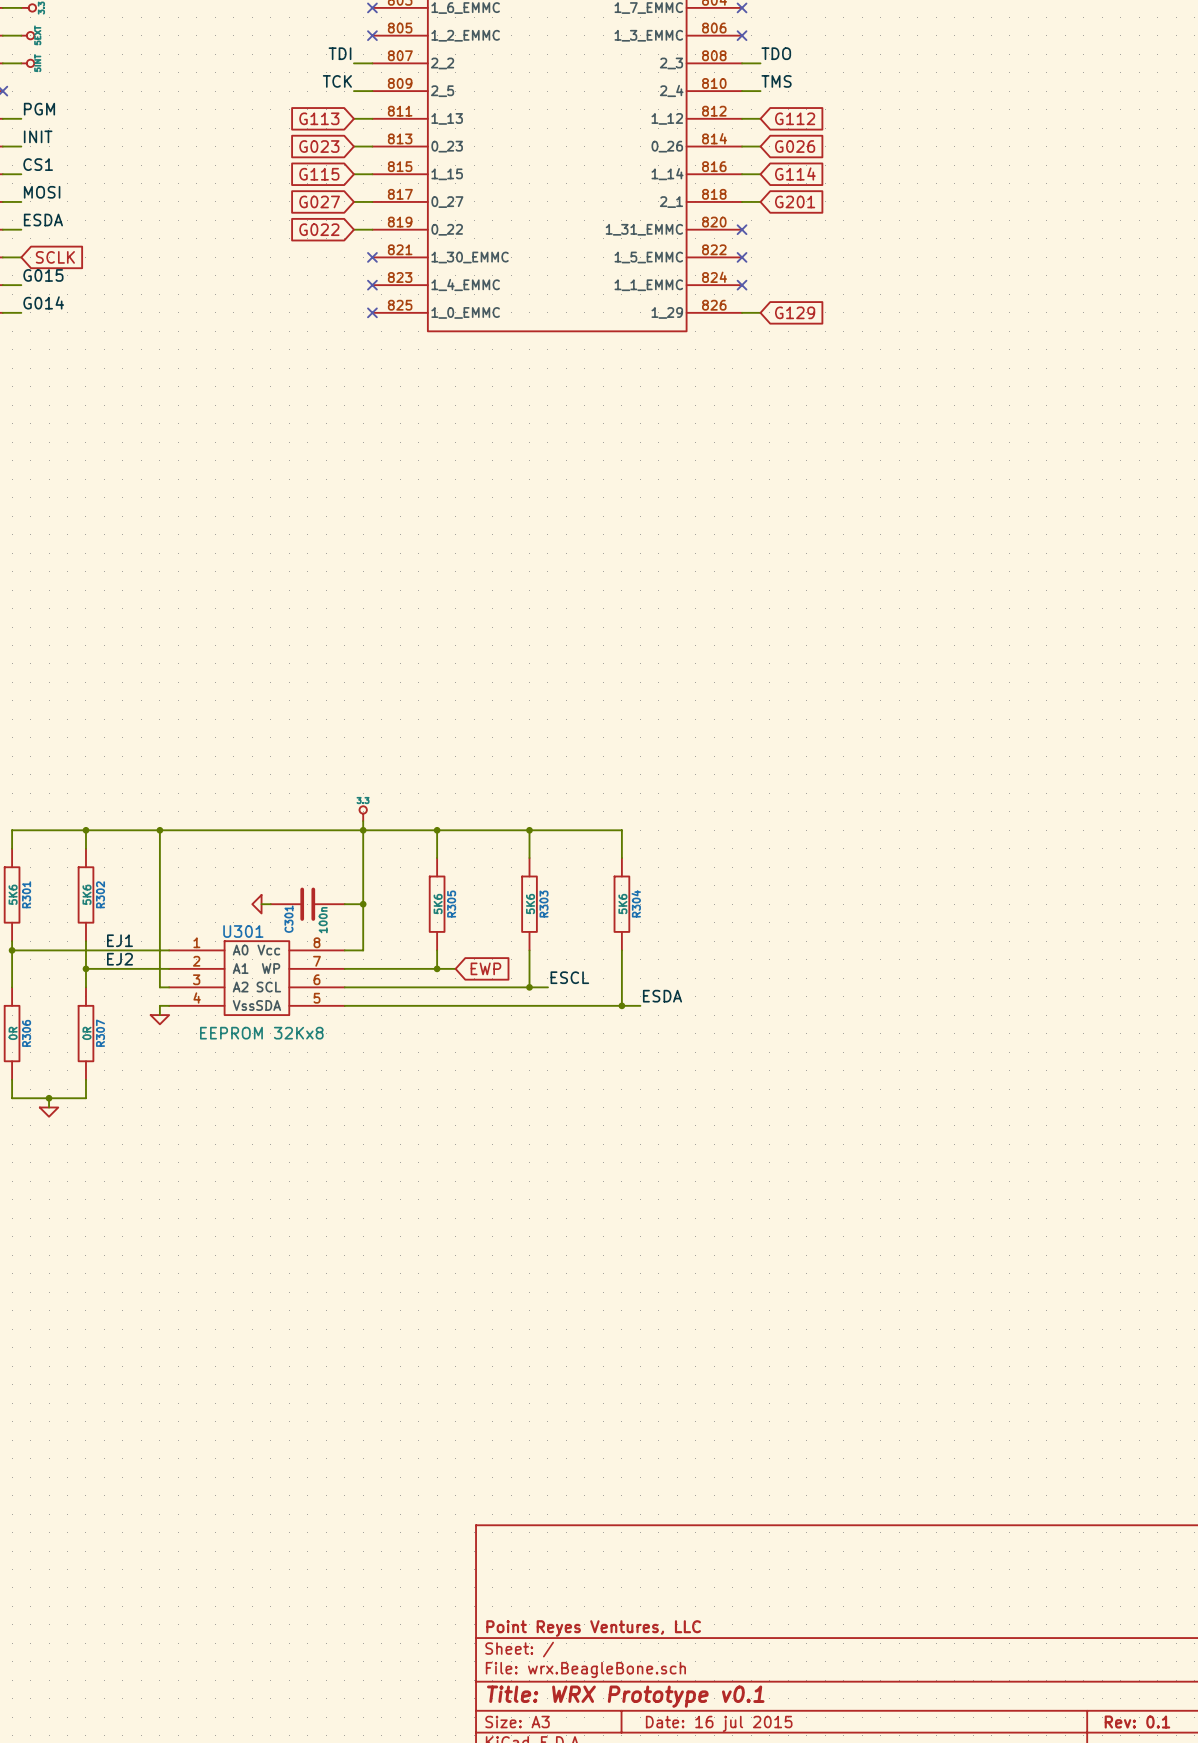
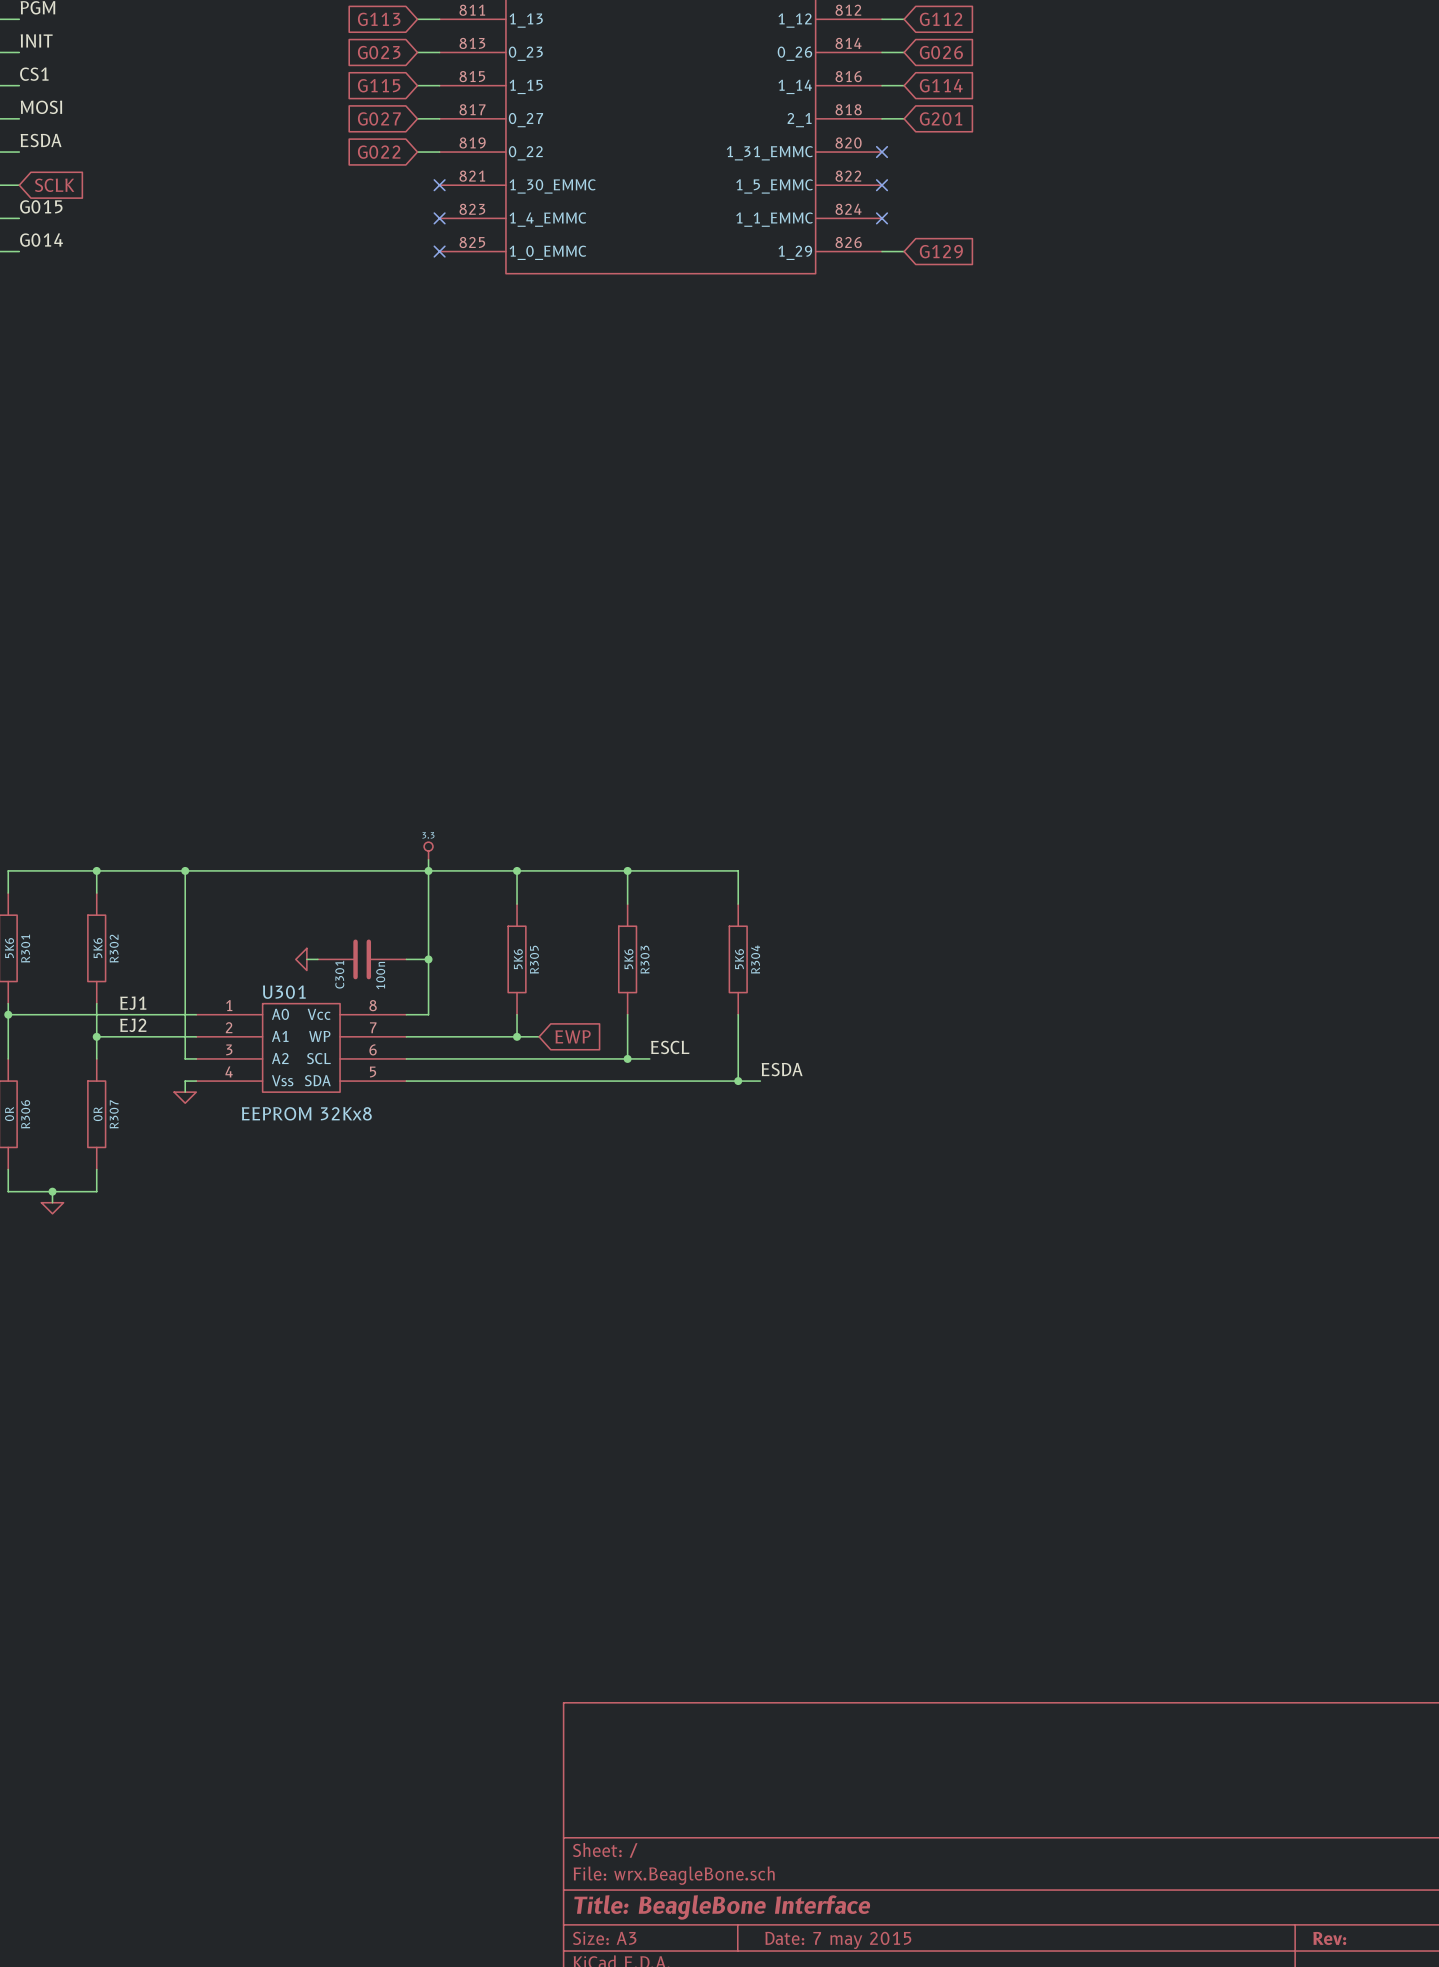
title block: Point Reyes Ventures, LLC (593, 1628) -> none
title block: Title: WRX Prototype v0.1 (625, 1696) -> Title: BeagleBone Interface (722, 1907)
title block: Rev: 0.1 (1137, 1722) -> Rev: (1329, 1938)
title block: Date: 16 jul 2015 (719, 1723) -> Date: 7 may 2015 (838, 1940)

